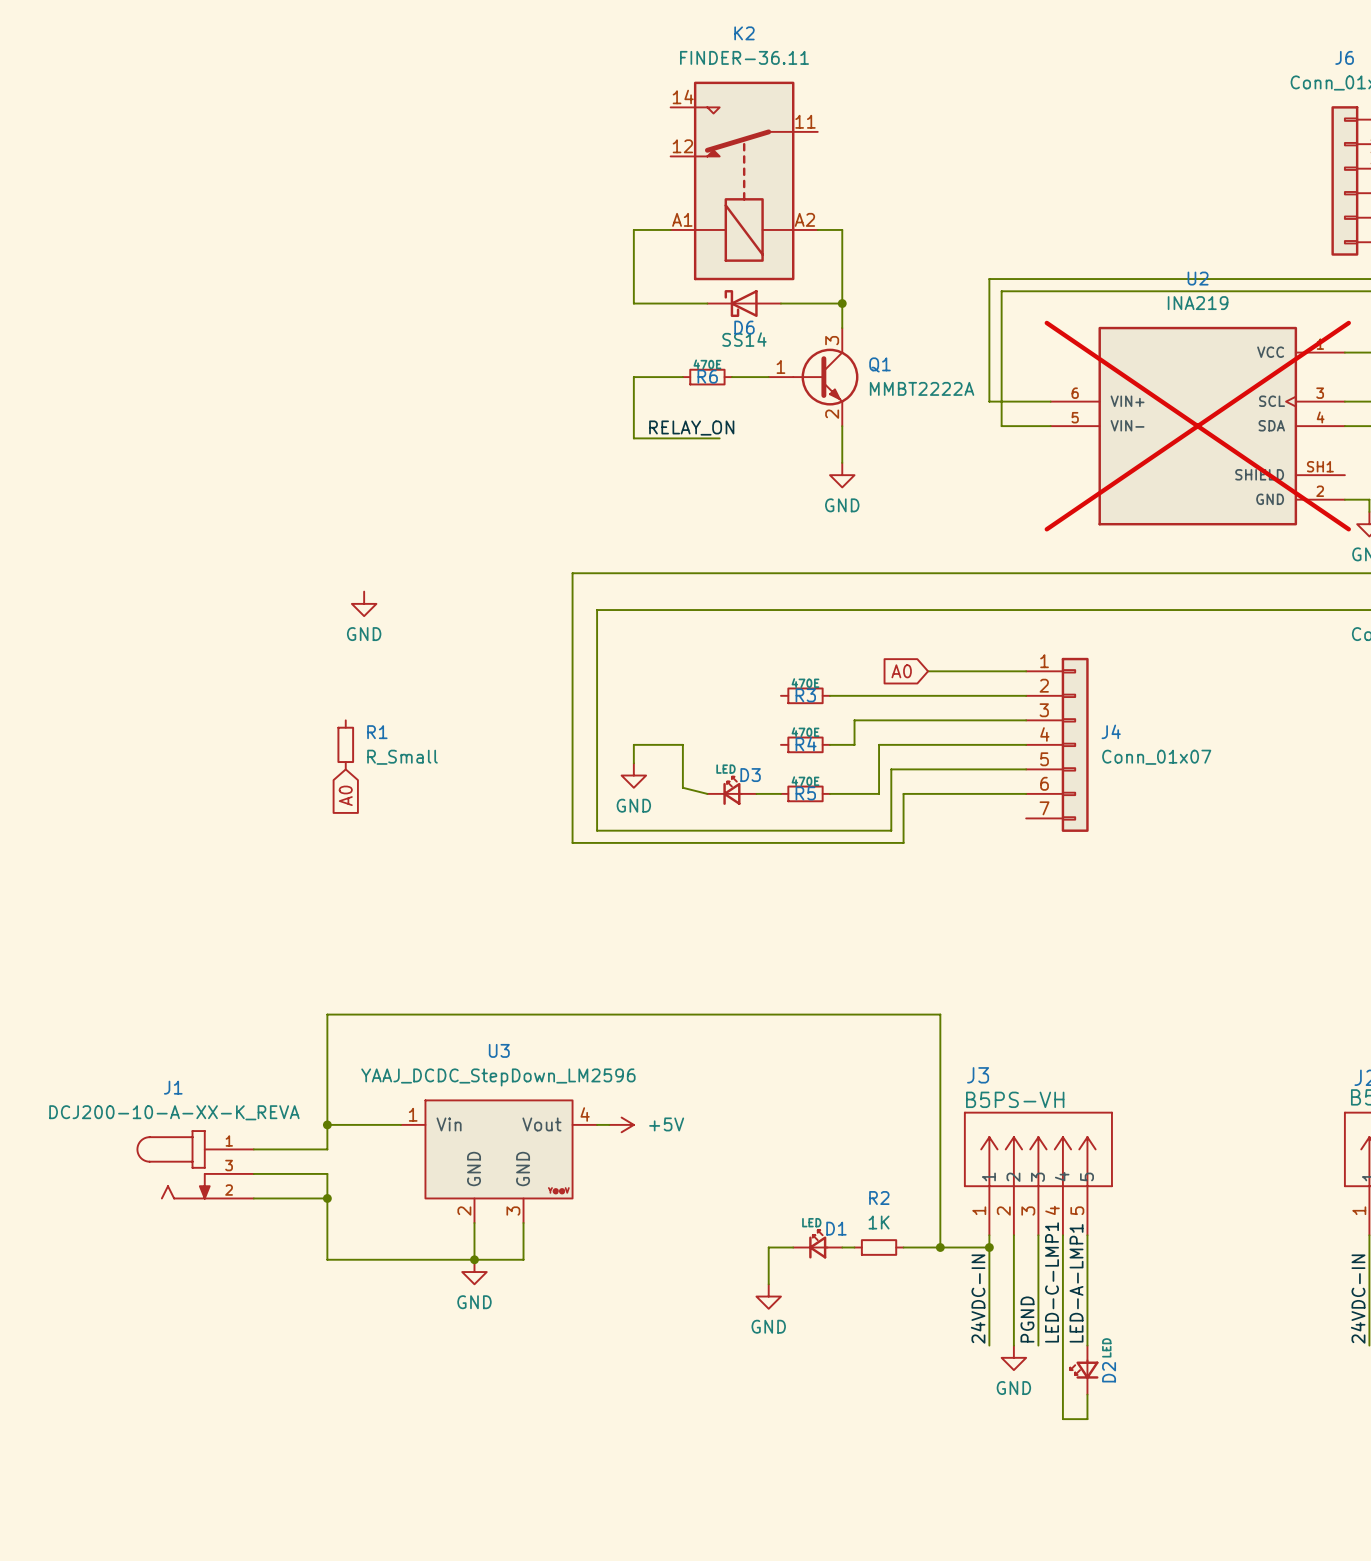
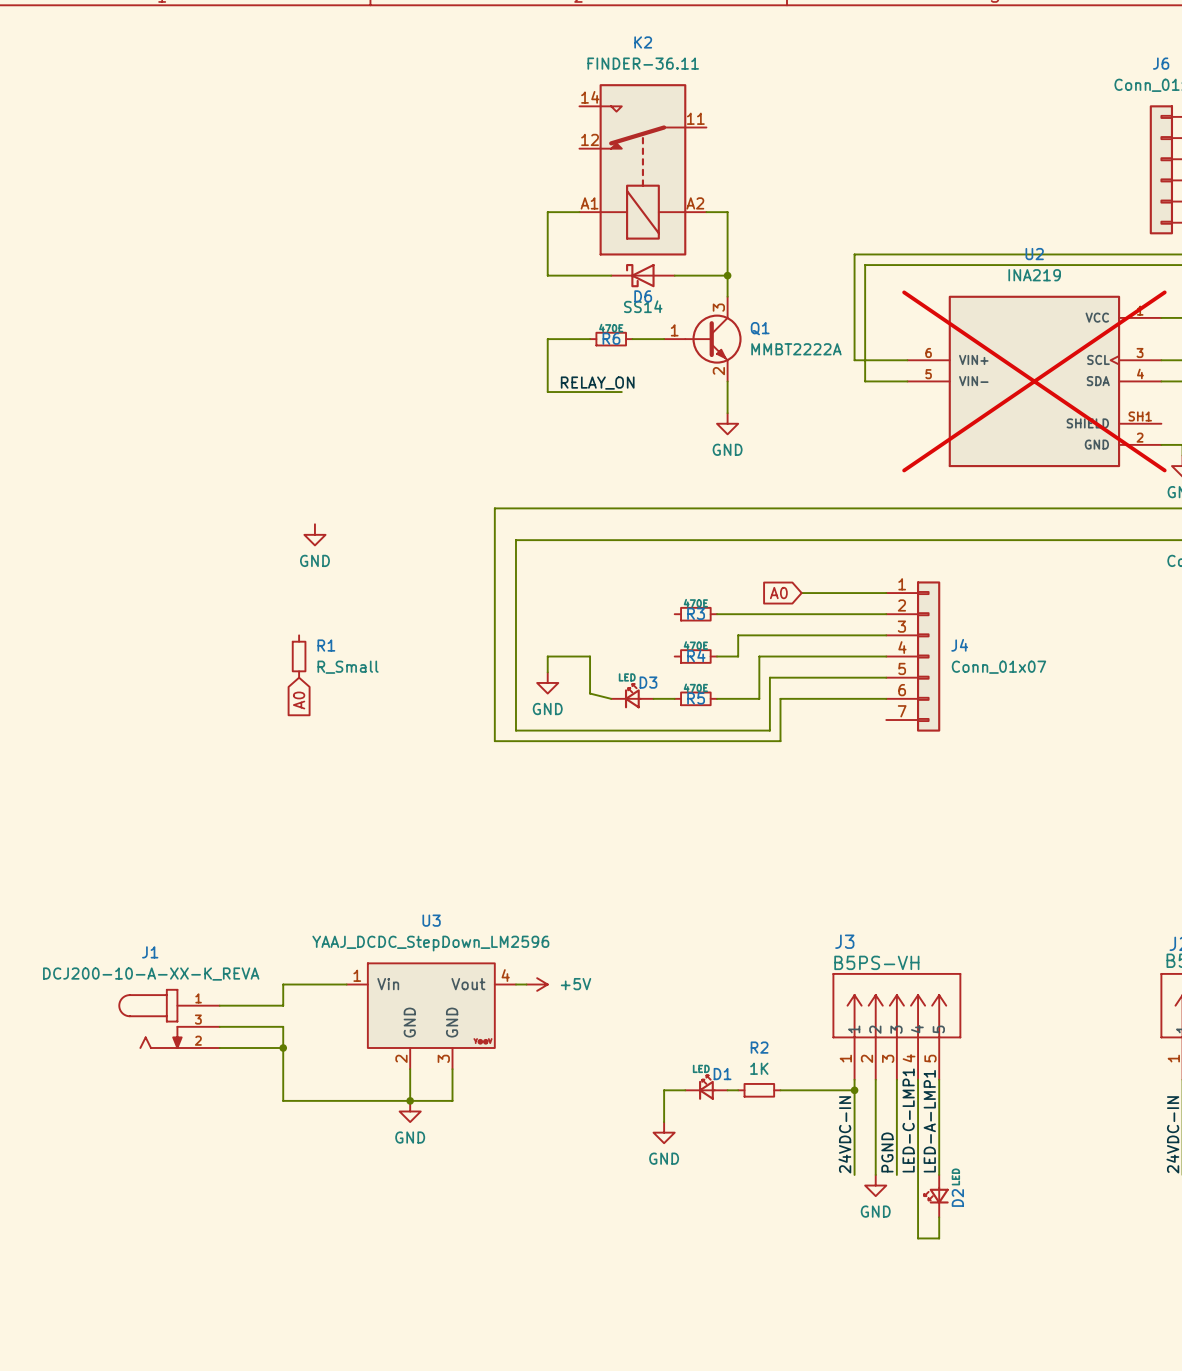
wire: (327, 1124) (327, 1014) (940, 1014) (940, 1247) -> none
junction: (327, 1124) -> none
junction: (940, 1247) -> none

